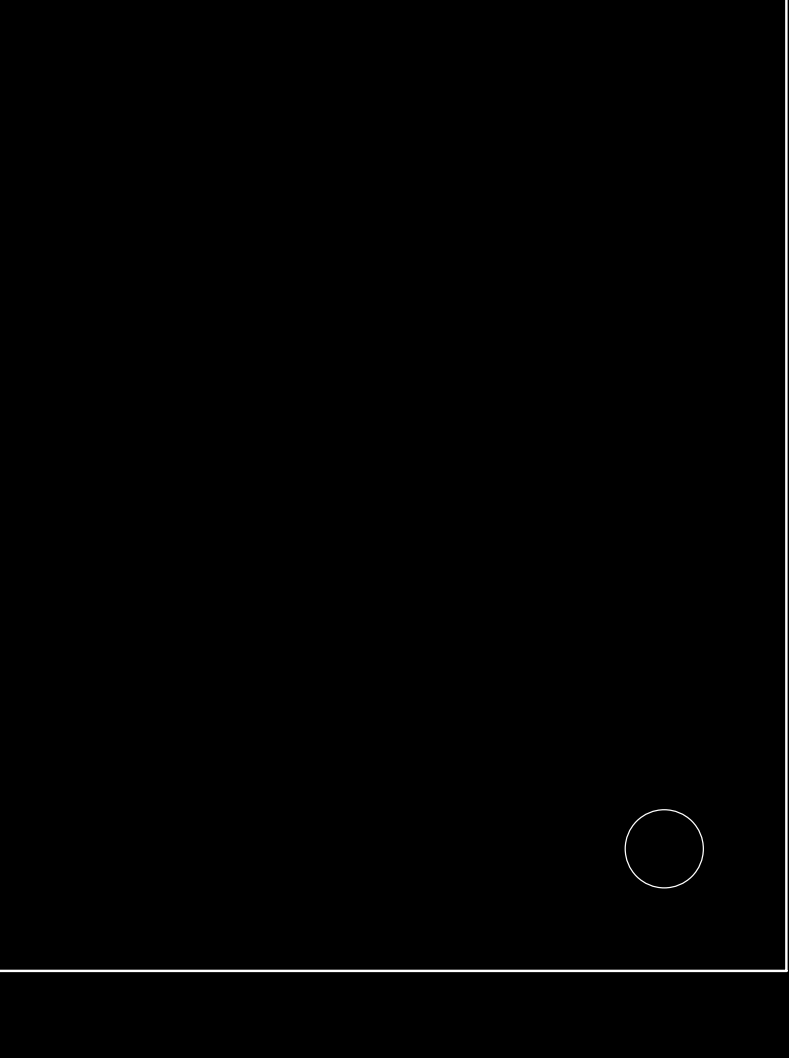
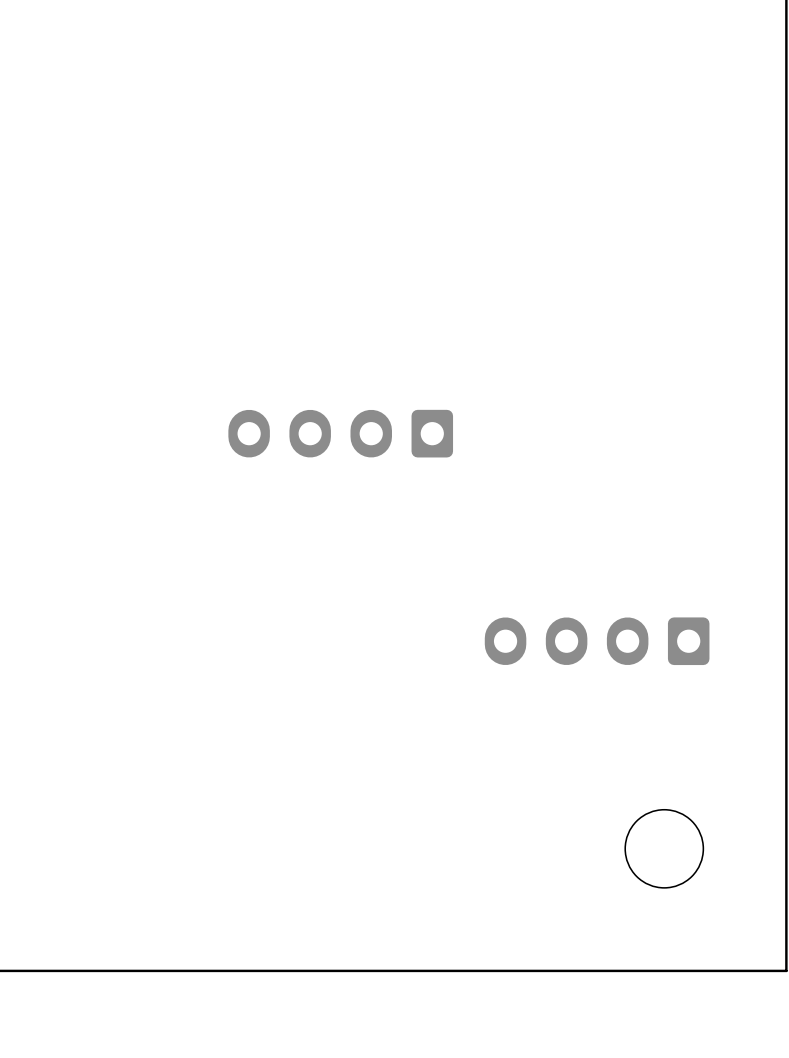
part: none -> (340, 433)
part: none -> (597, 641)

